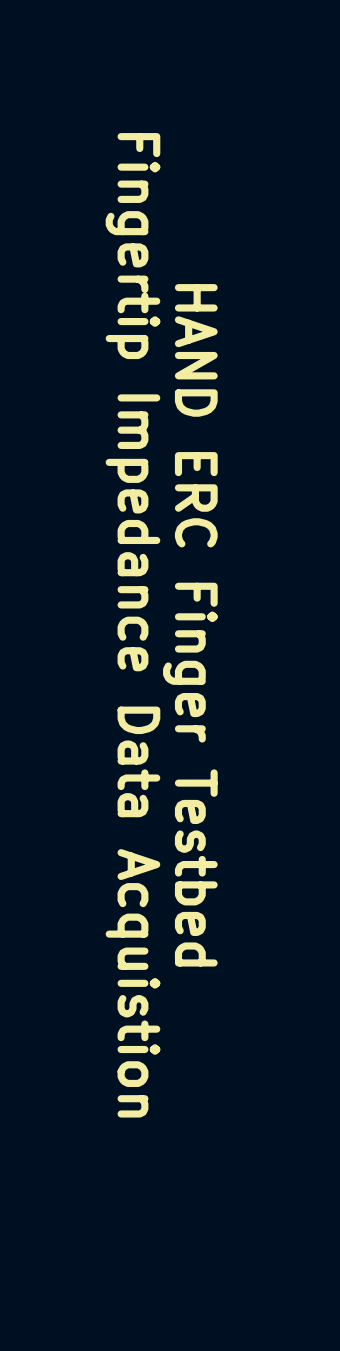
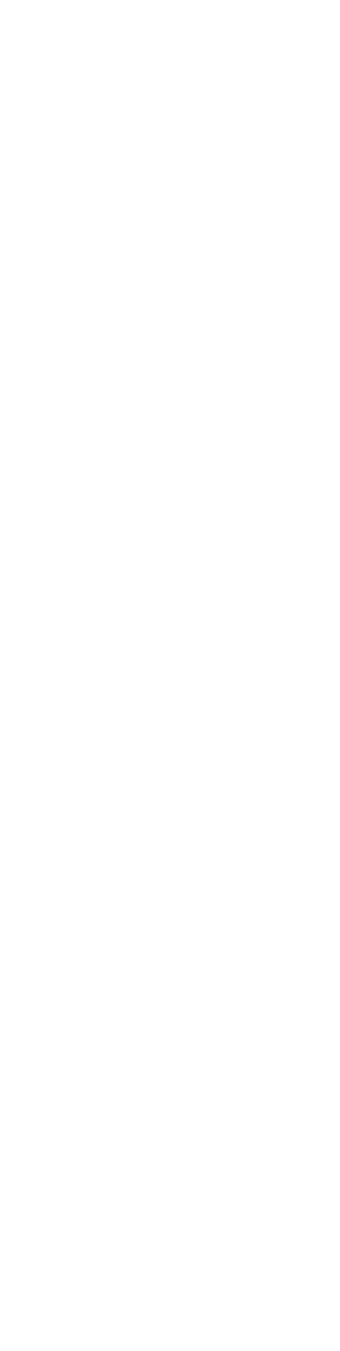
text: Fingertip Impedance Data Acquistion (132, 625) -> none
text: HAND ERC Finger Testbed (190, 625) -> none

